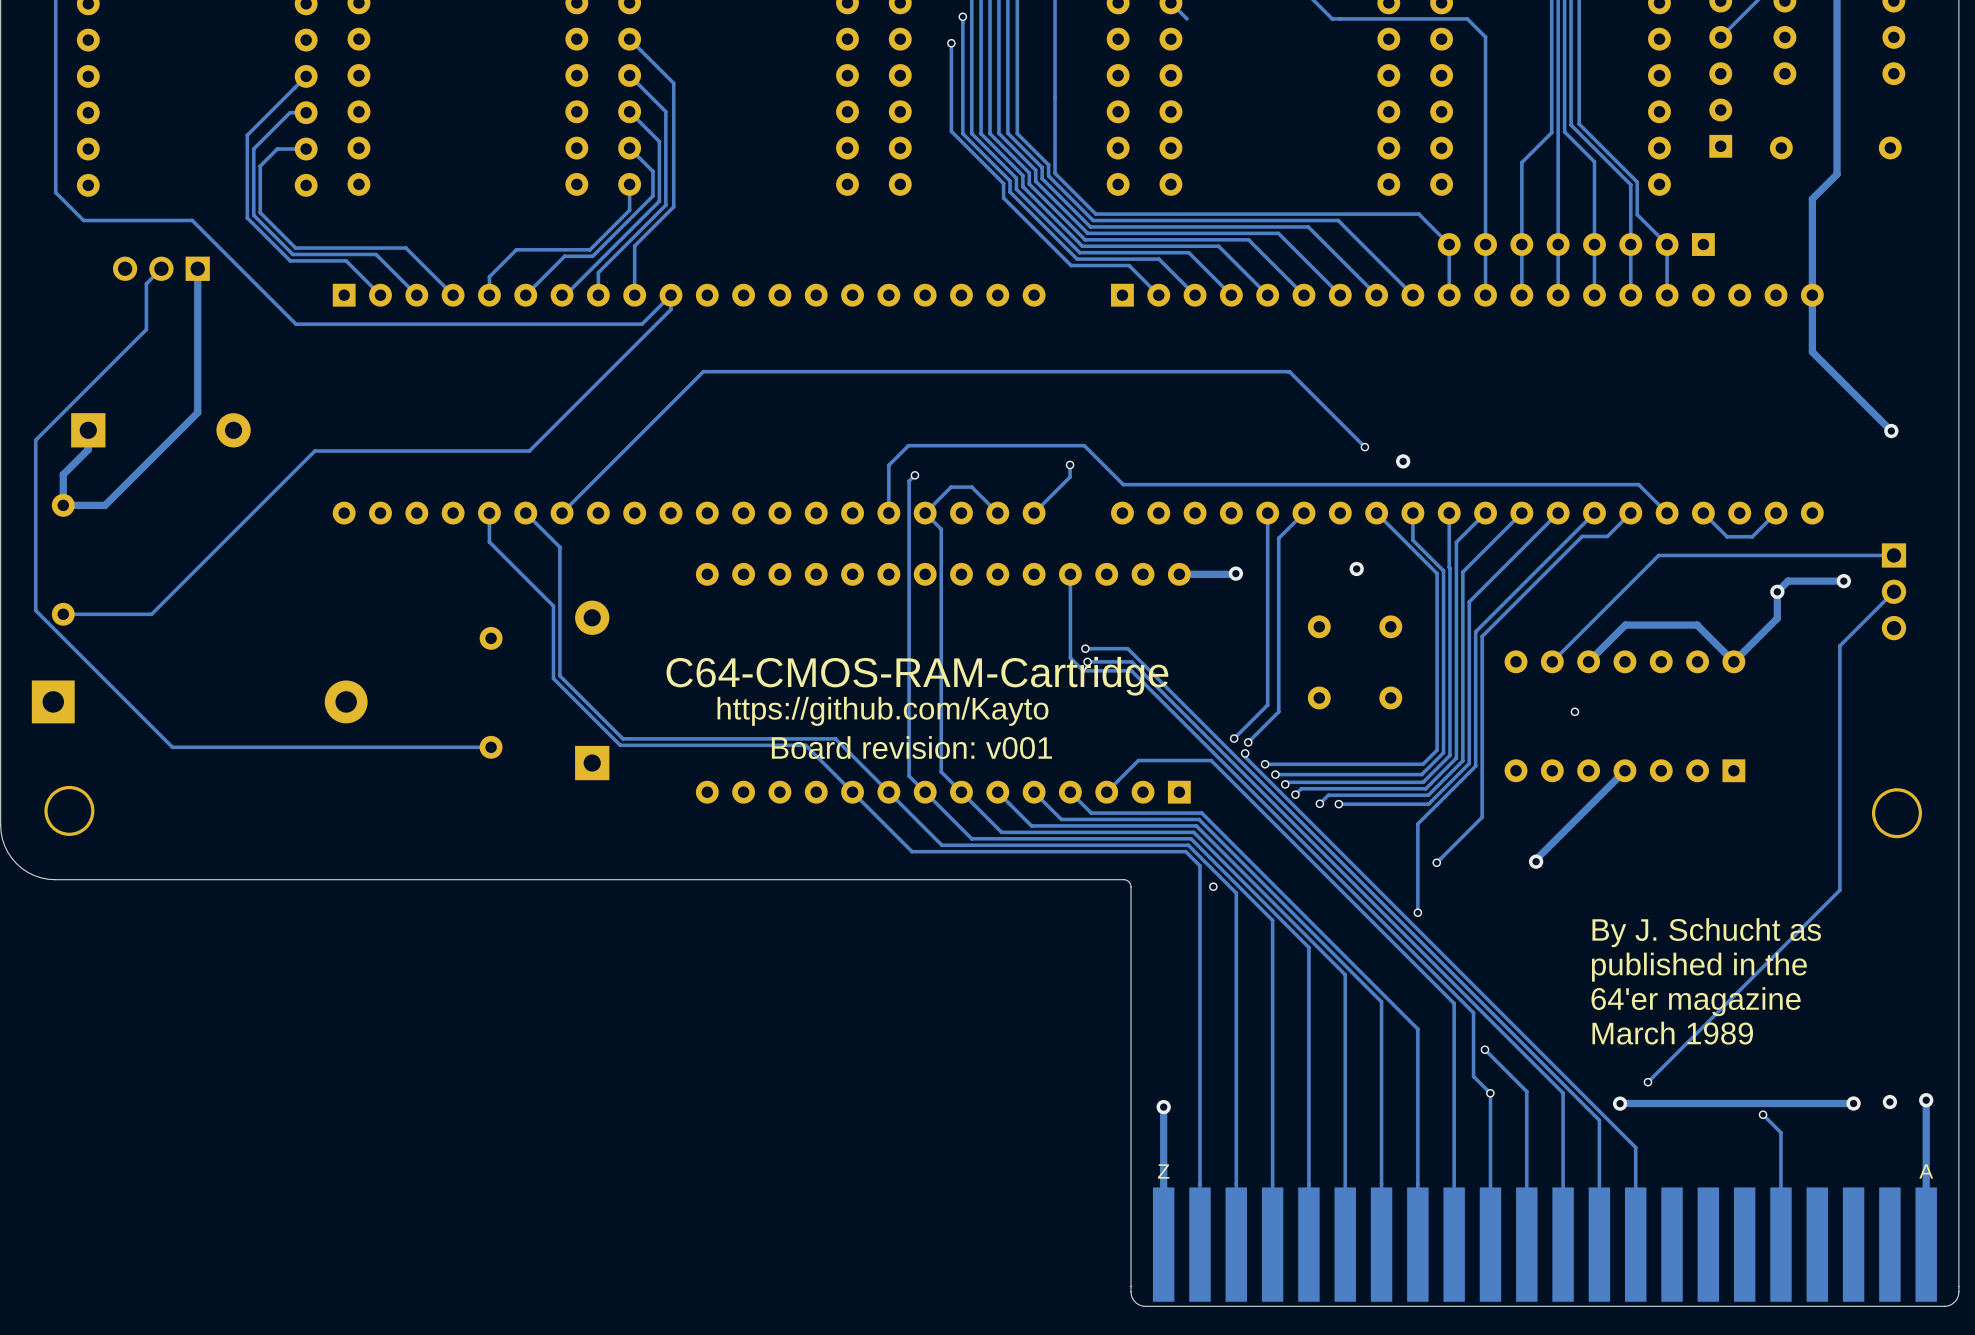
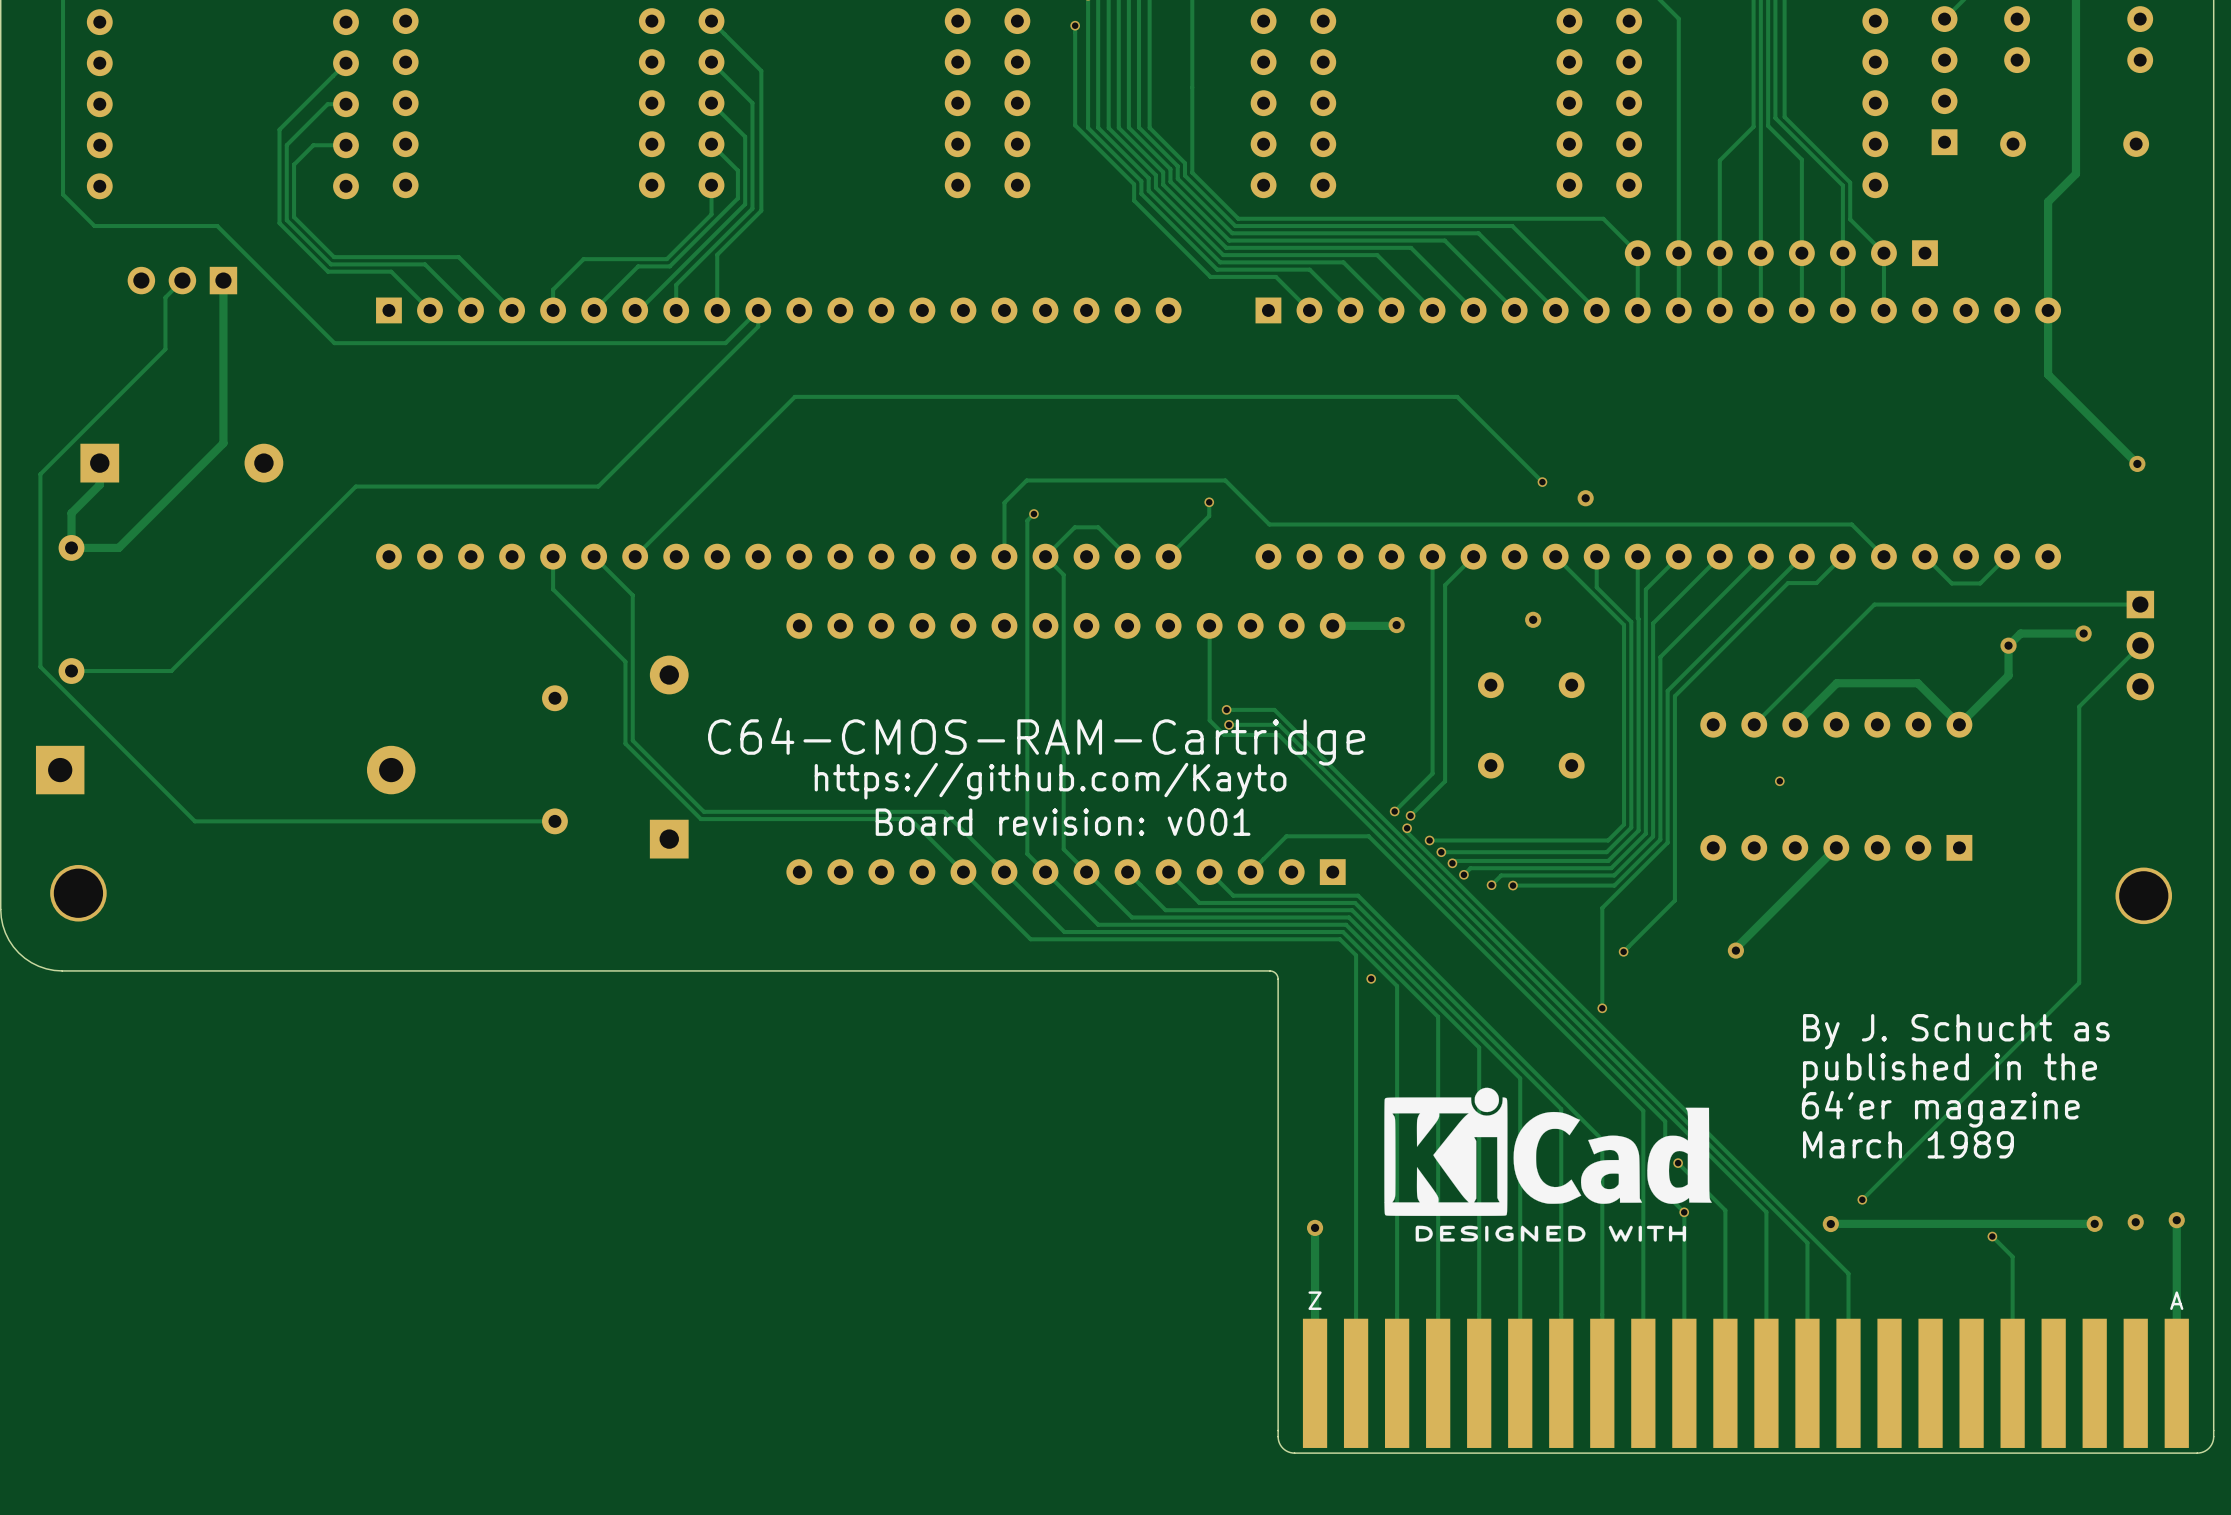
drawing: none -> [1384, 1087, 1712, 1242]

